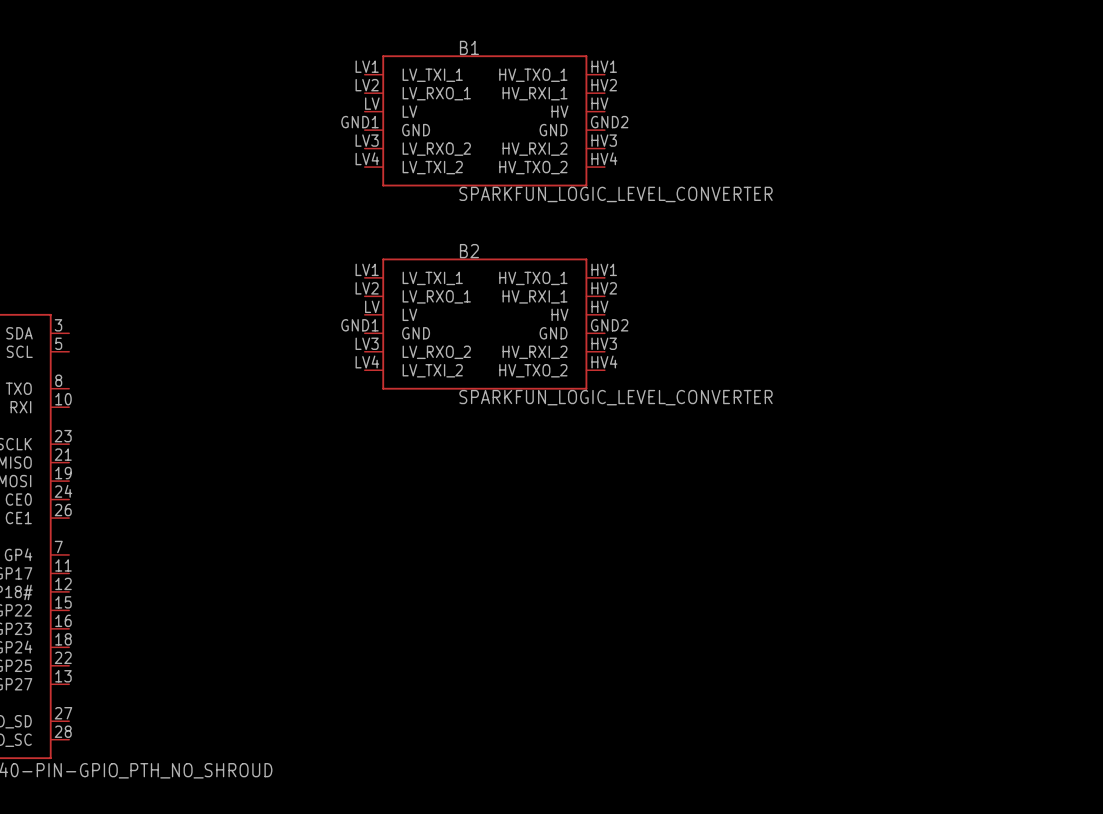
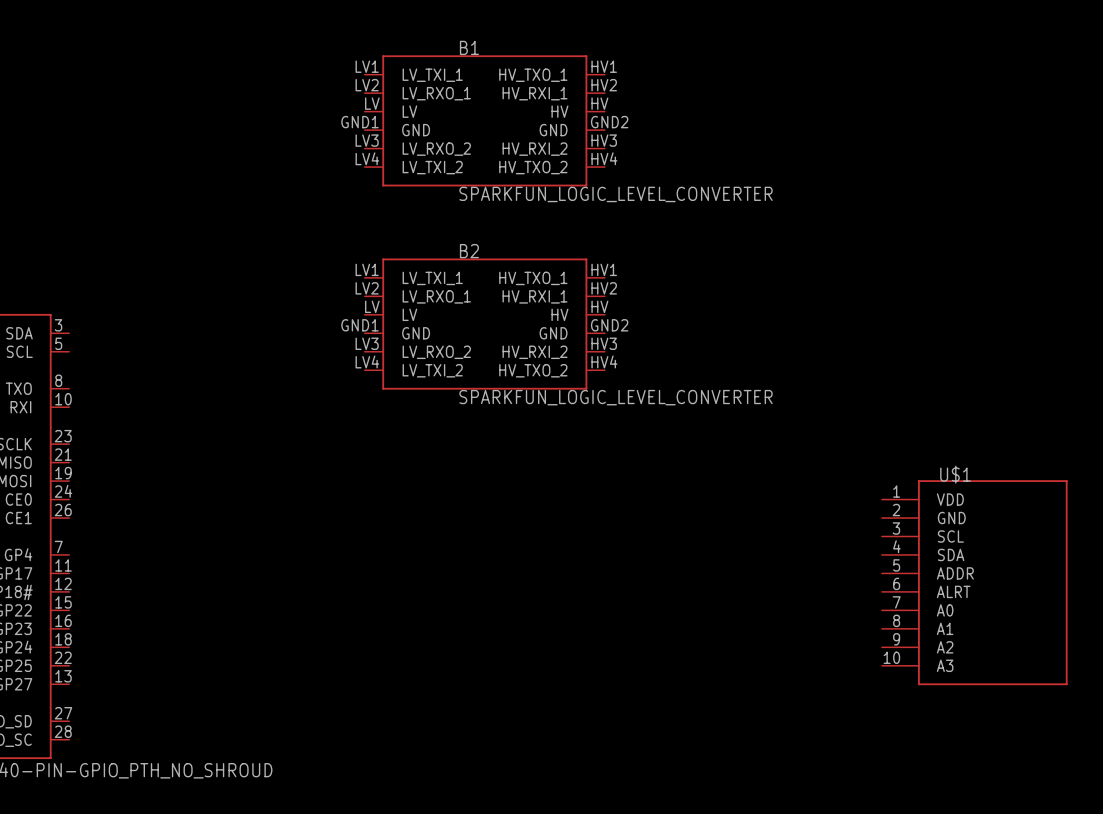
U$1: none -> (974, 582)

